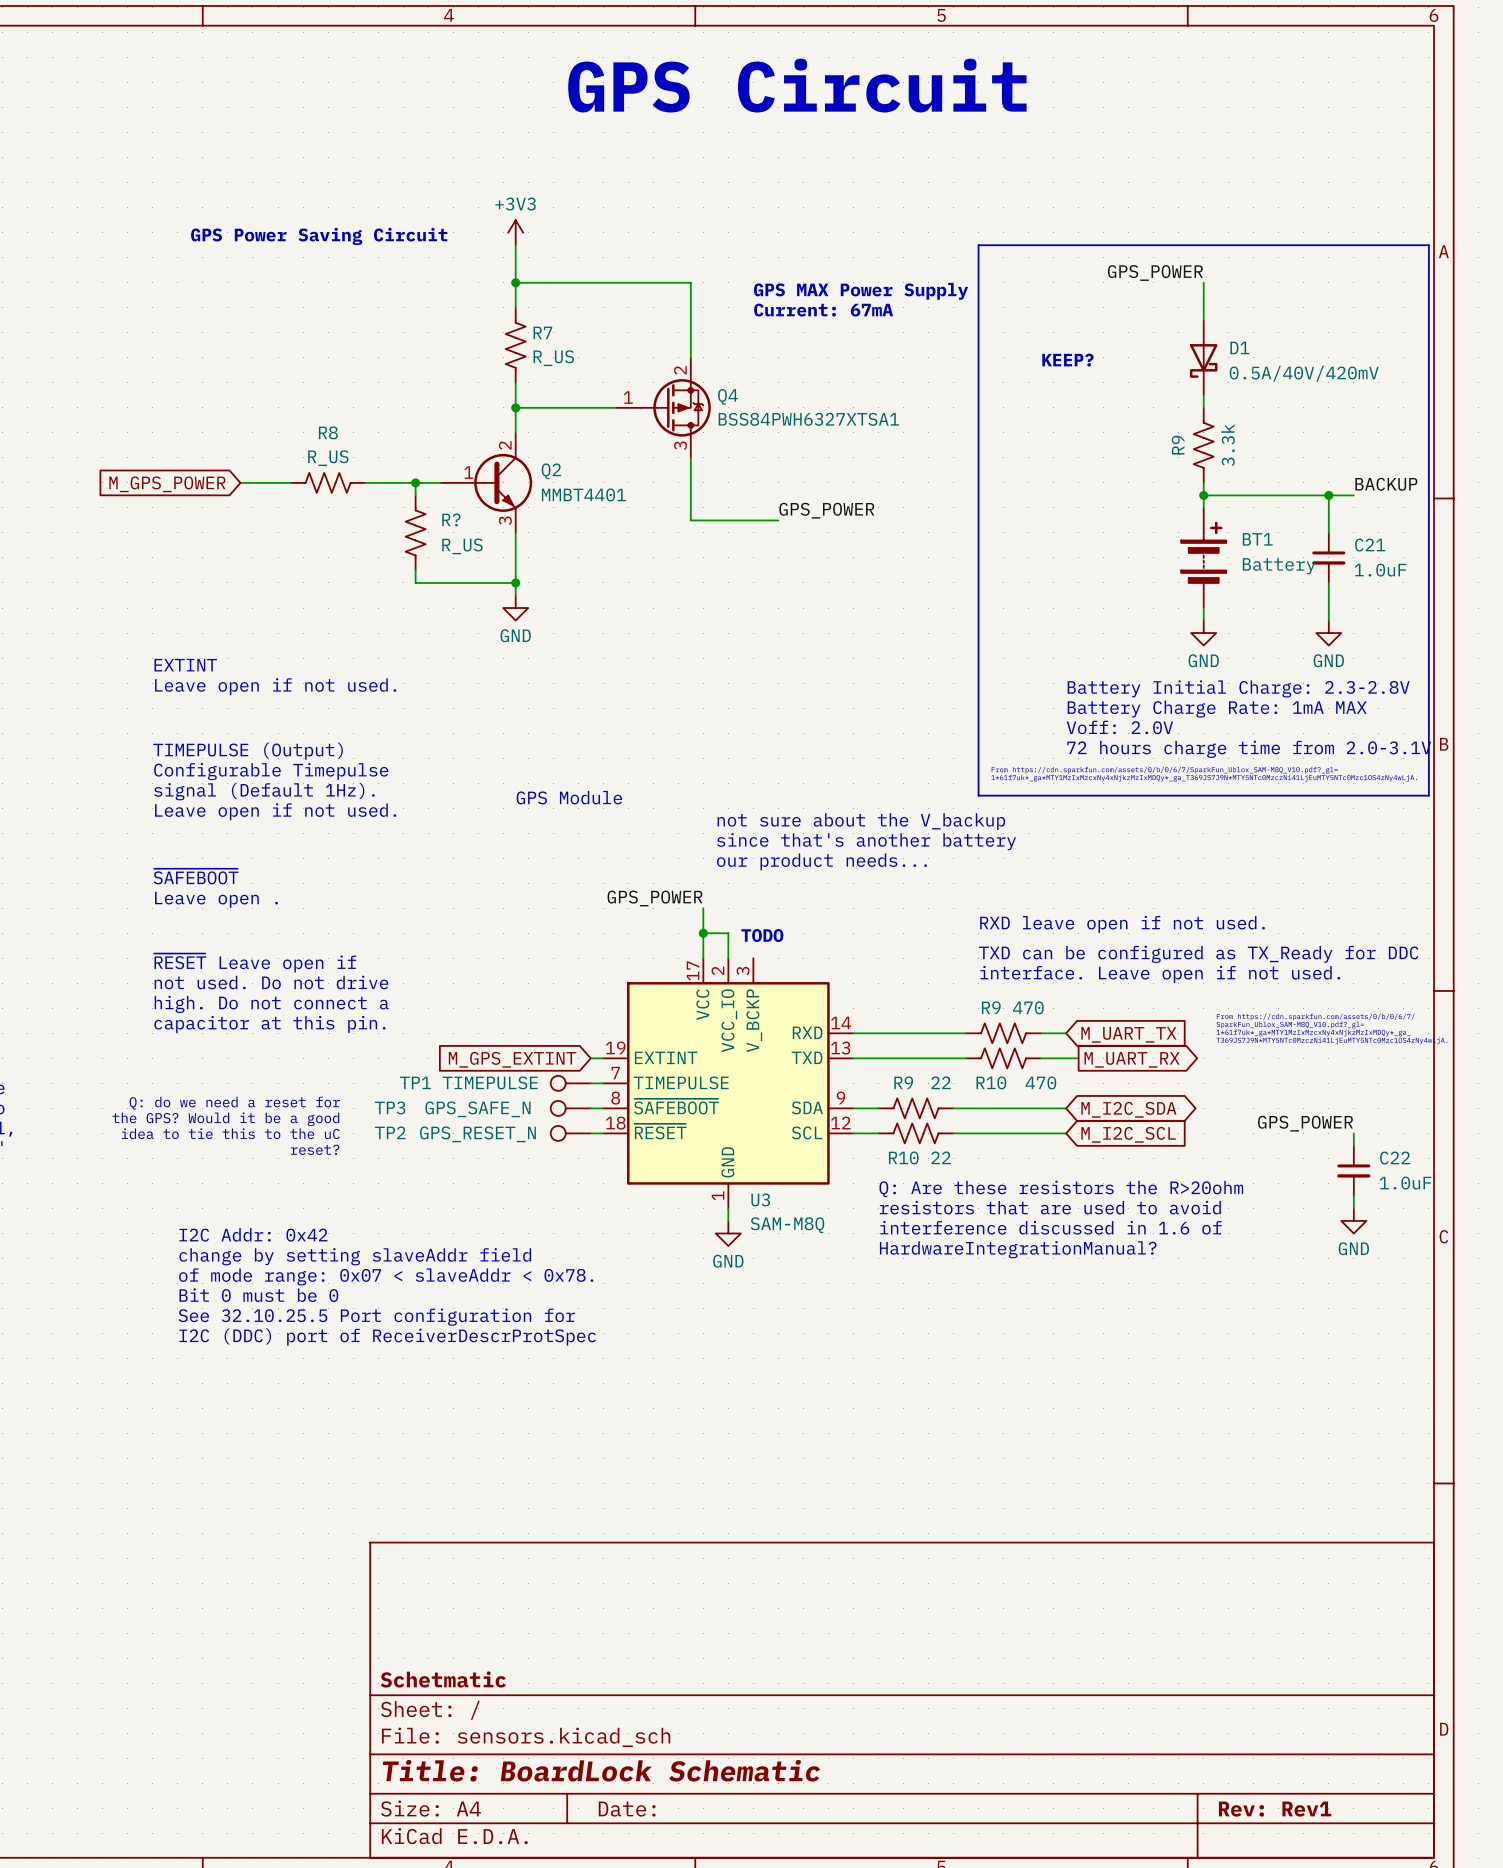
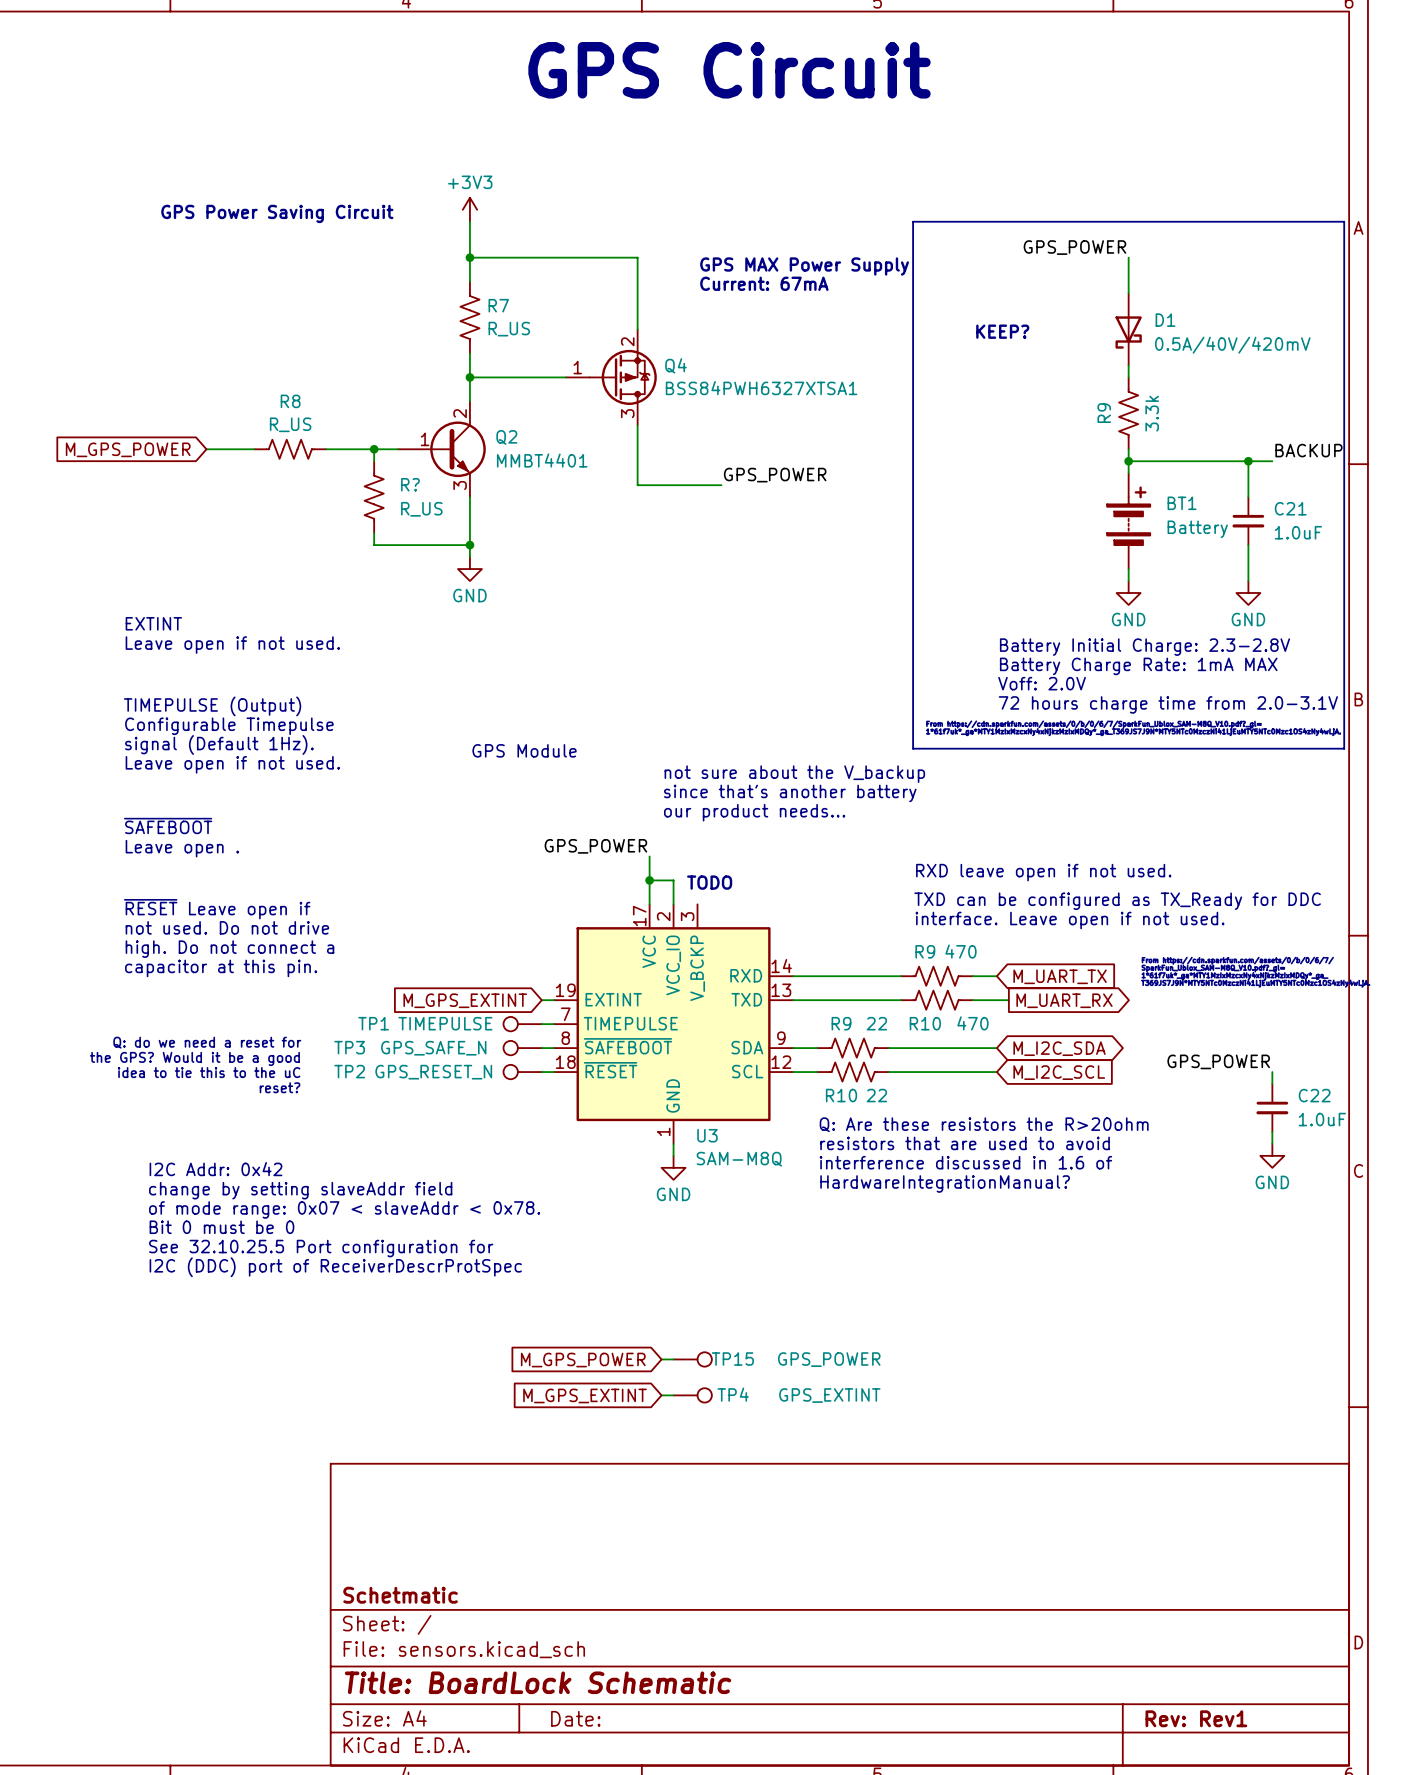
wire: none -> (661, 1359) (673, 1359)
TP15: none -> GPS_POWER (692, 1359)
global label: none -> M_GPS_POWER (583, 1360)
wire: none -> (661, 1395) (673, 1395)
TP4: none -> GPS_EXTINT (692, 1395)
global label: none -> M_GPS_EXTINT (585, 1395)

